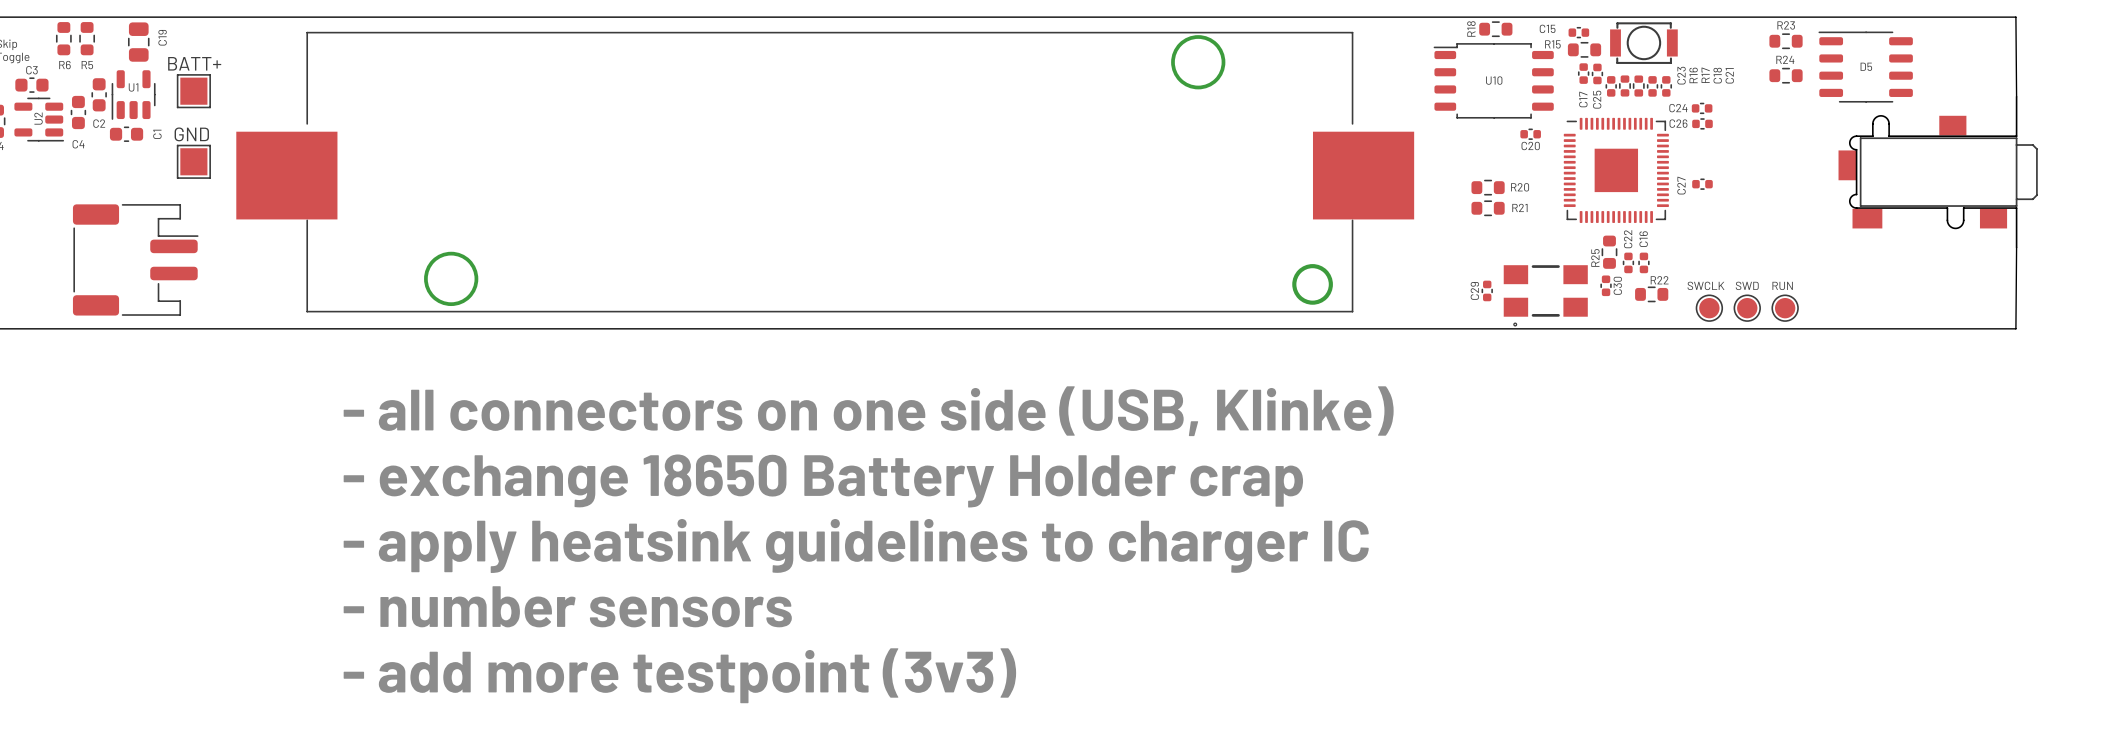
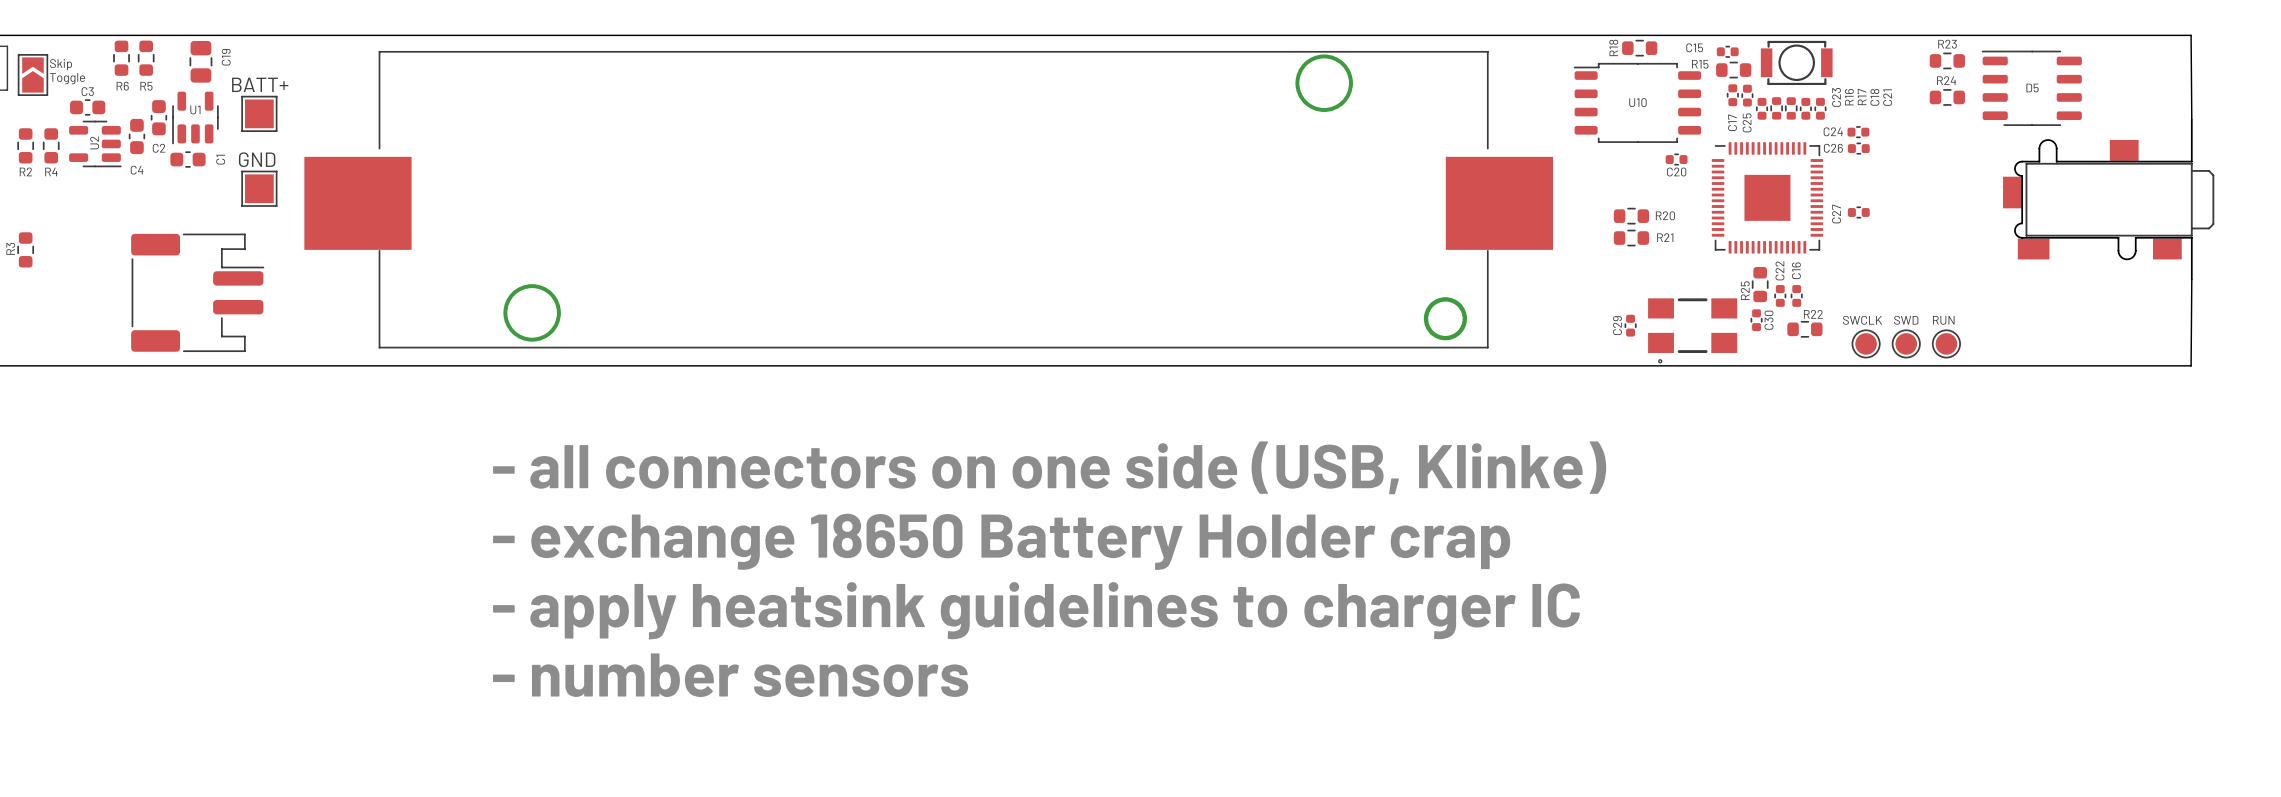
text position: - all connectors on one side (USB, Klinke) (868, 411) -> - all connectors on one side (USB, Klinke) (1049, 467)
text position: - exchange 18650 Battery Holder crap (823, 480) -> - exchange 18650 Battery Holder crap (1001, 541)
text position: - apply heatsink guidelines to charger IC (856, 545) -> - apply heatsink guidelines to charger IC (1036, 610)
text position: - number sensors (567, 606) -> - number sensors (730, 675)
text: - add more testpoint (3v3) (679, 675) -> none

